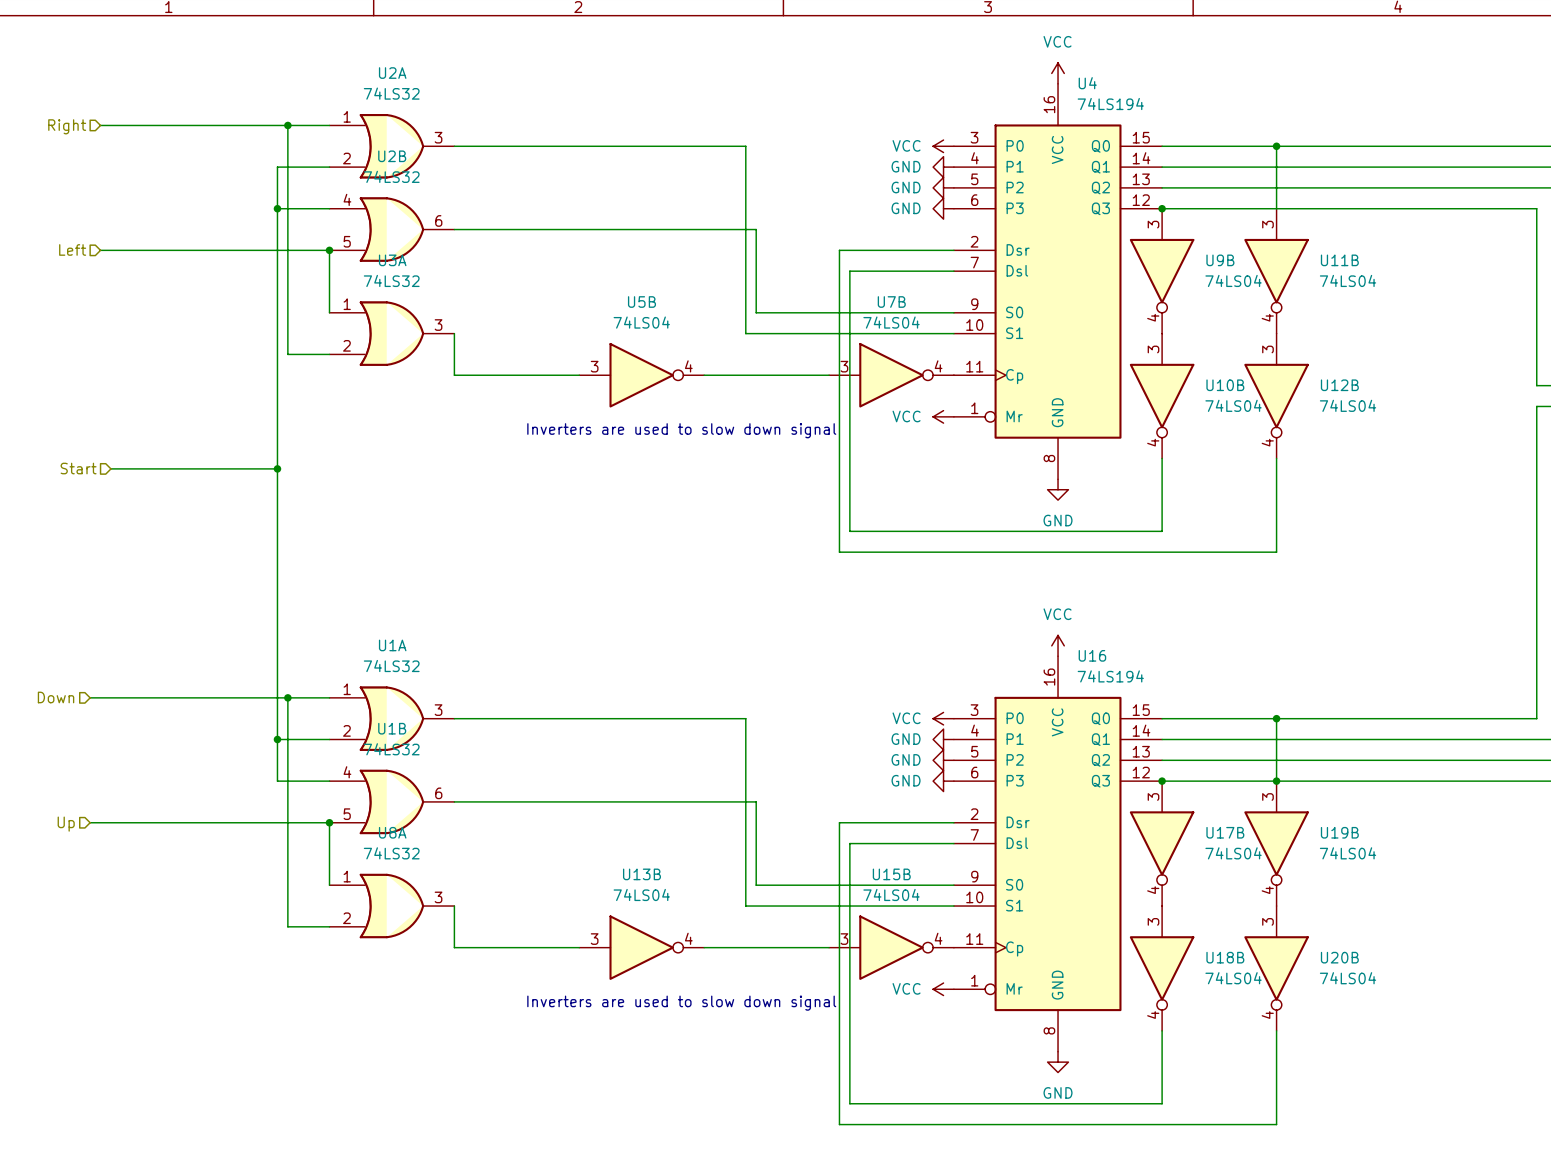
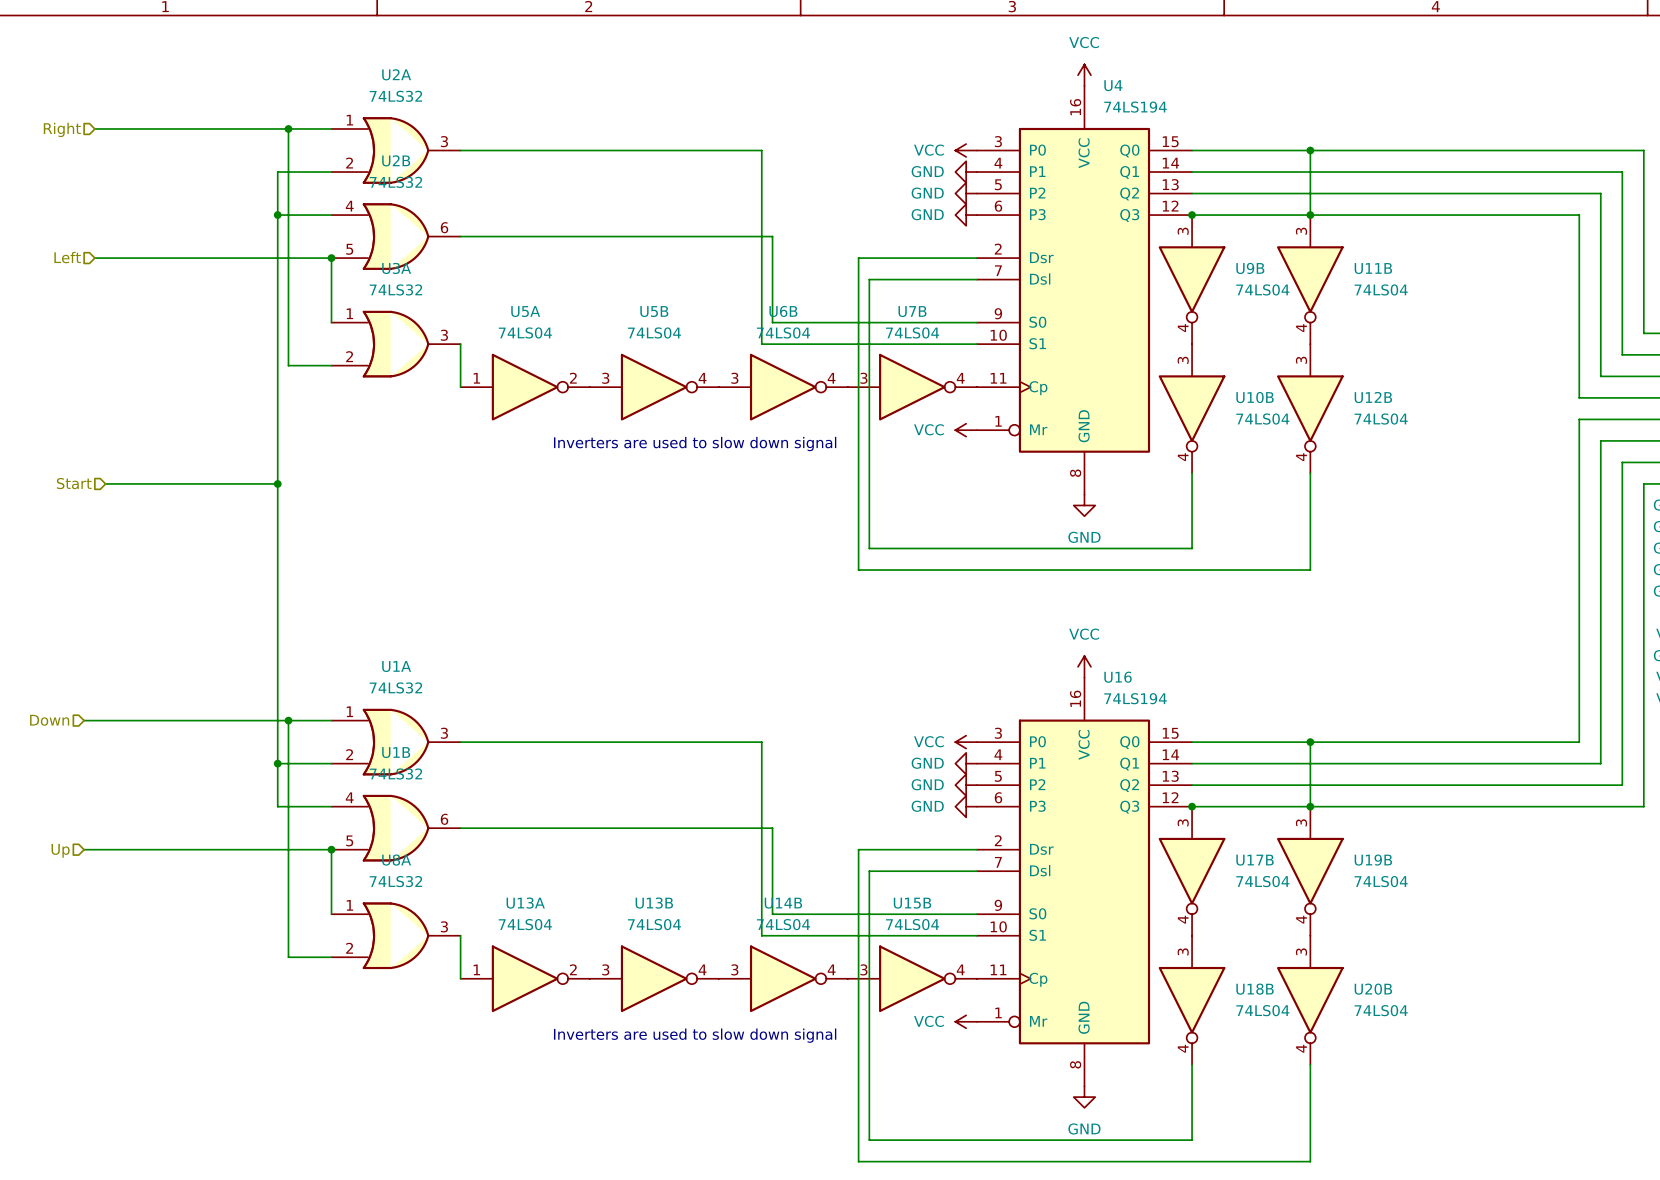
junction: none -> (1310, 215)
U5A: none -> 74LS04 (525, 387)
U6B: none -> 74LS04 (783, 387)
U13A: none -> 74LS04 (525, 978)
U14B: none -> 74LS04 (783, 978)

